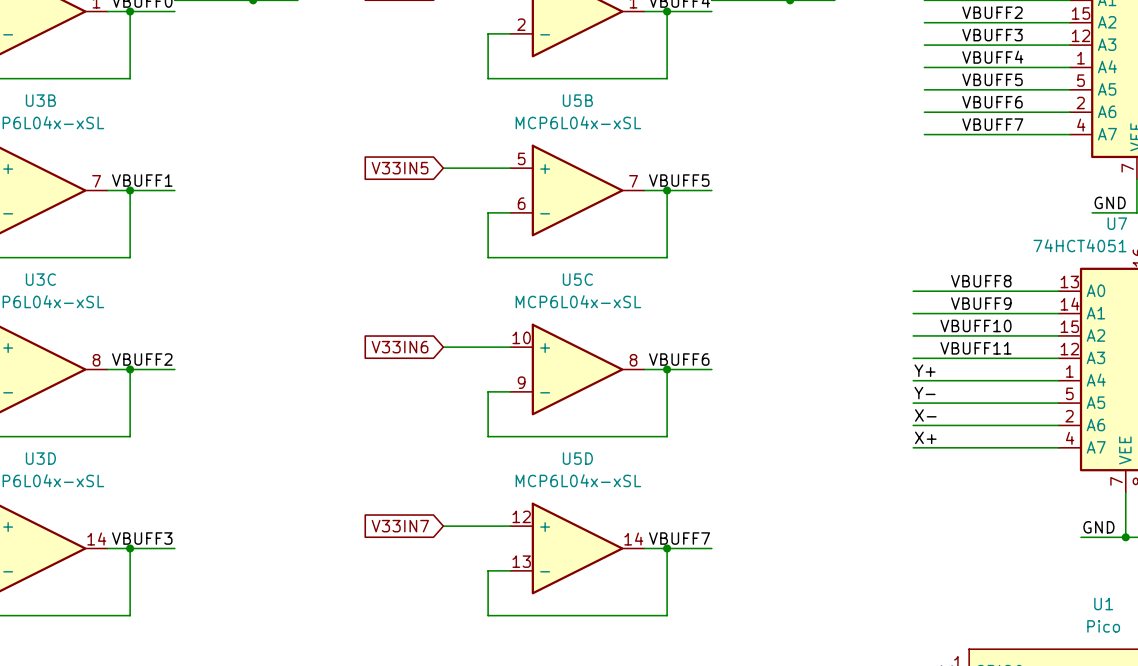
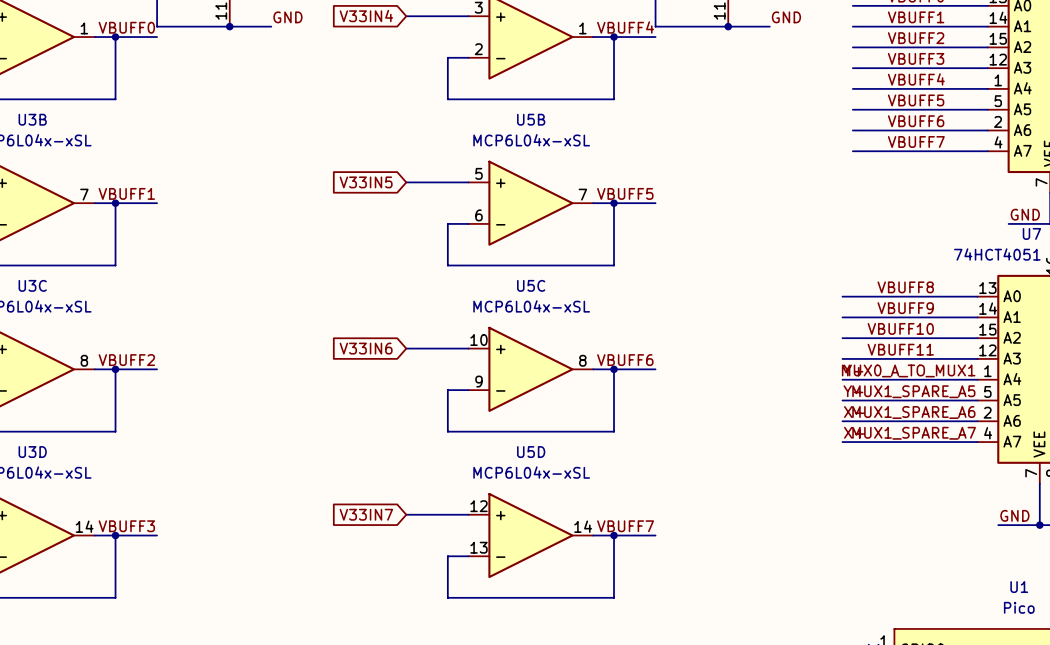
label: none -> MUX0_A_TO_MUX1 (908, 370)
label: none -> MUX1_SPARE_A5 (913, 391)
label: none -> MUX1_SPARE_A6 (913, 412)
label: none -> MUX1_SPARE_A7 (914, 433)

